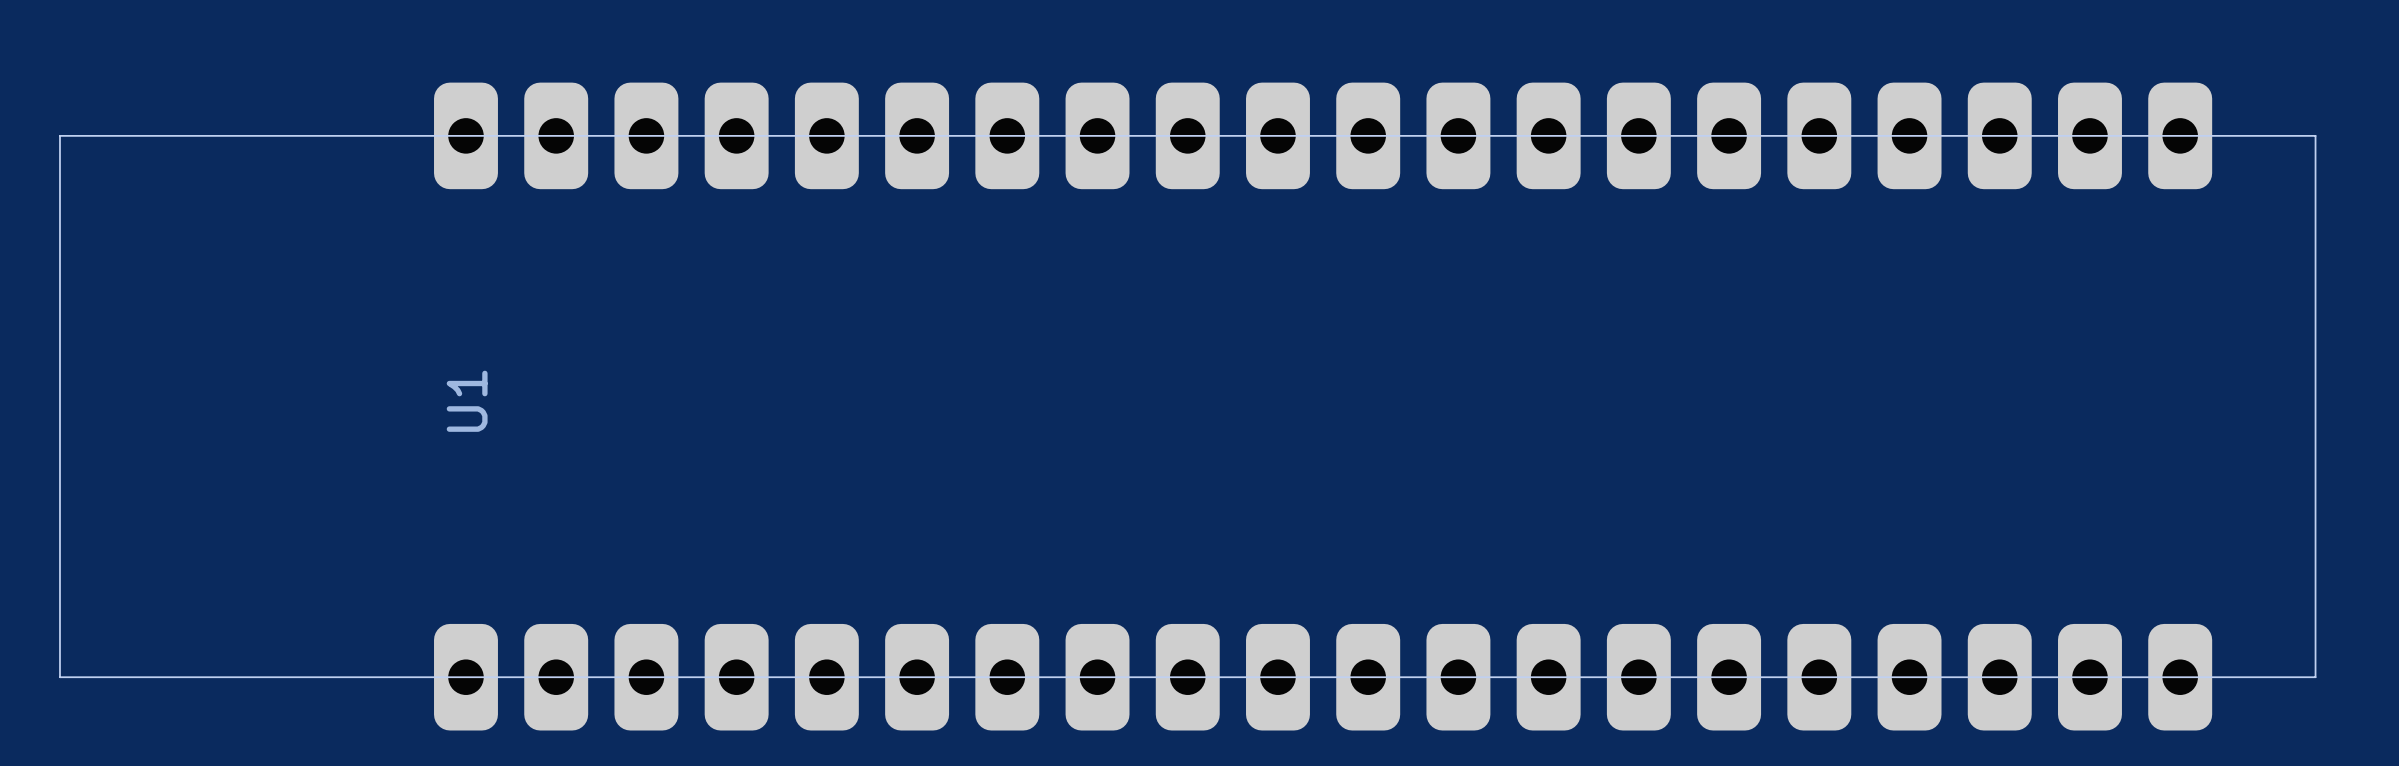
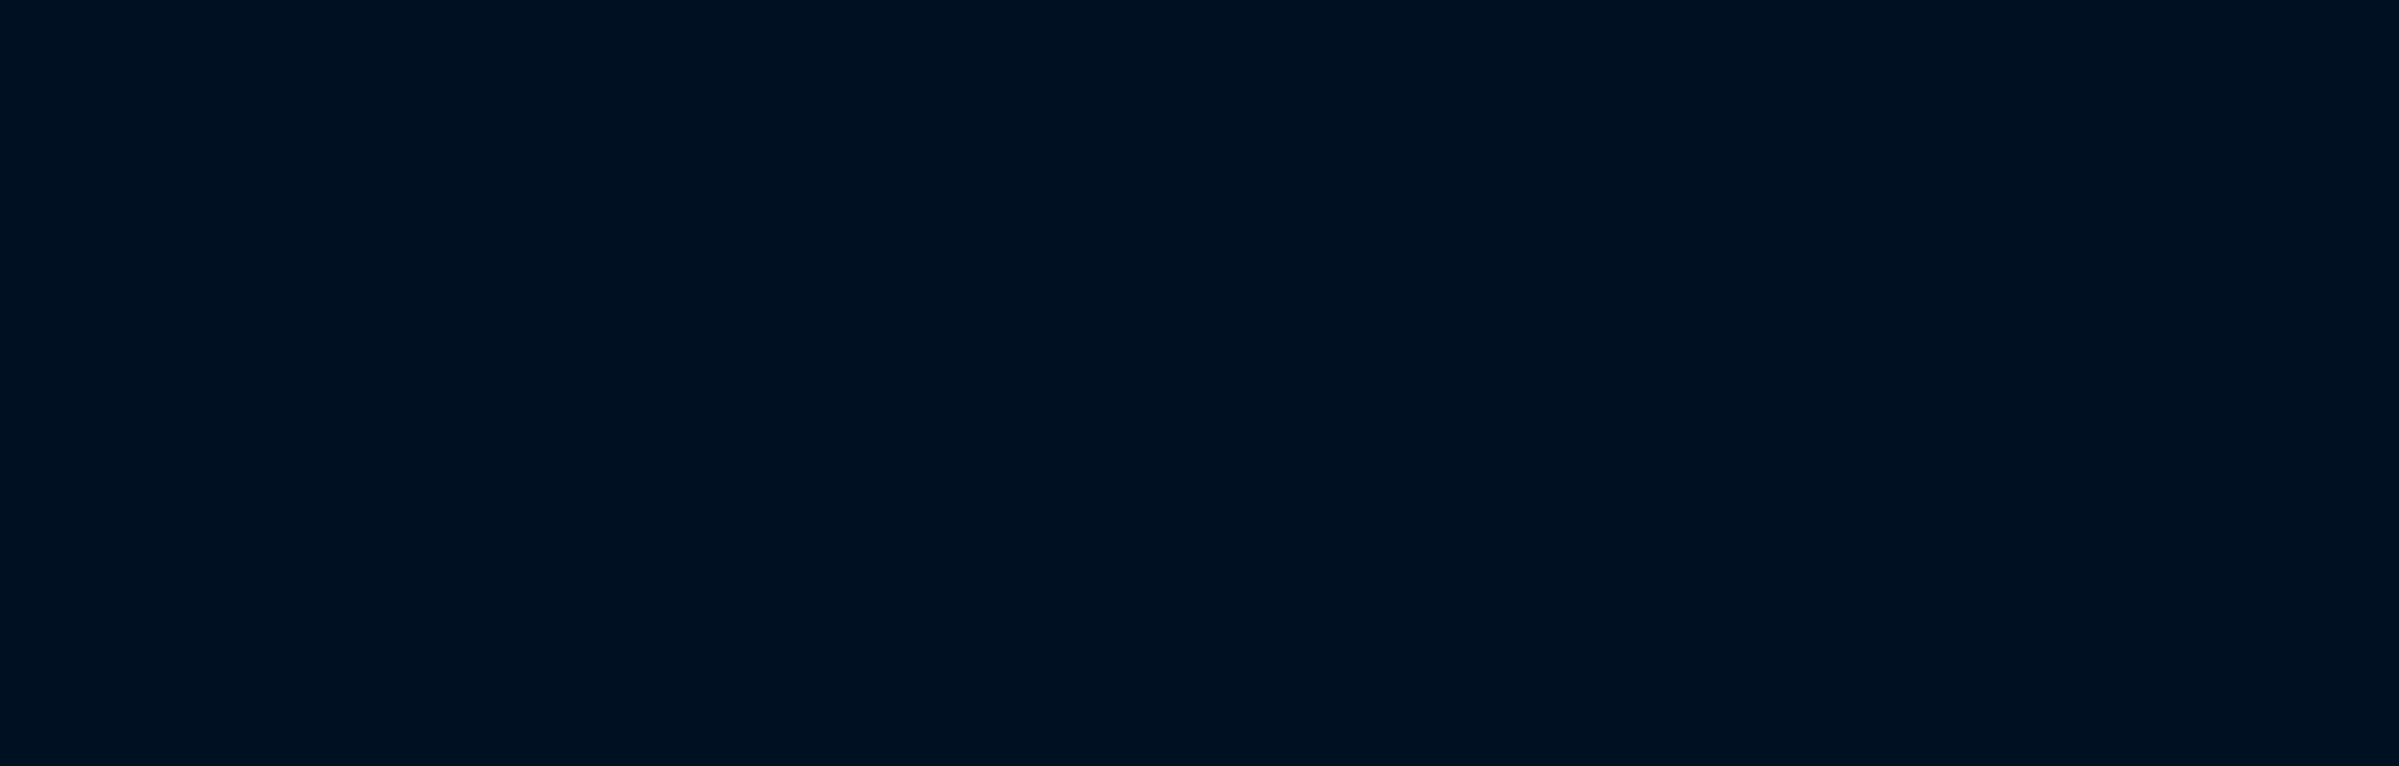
board edge: (59, 135) (2315, 135) (2315, 677) (59, 677) (59, 135) -> none
U1: (1323, 406) -> none

